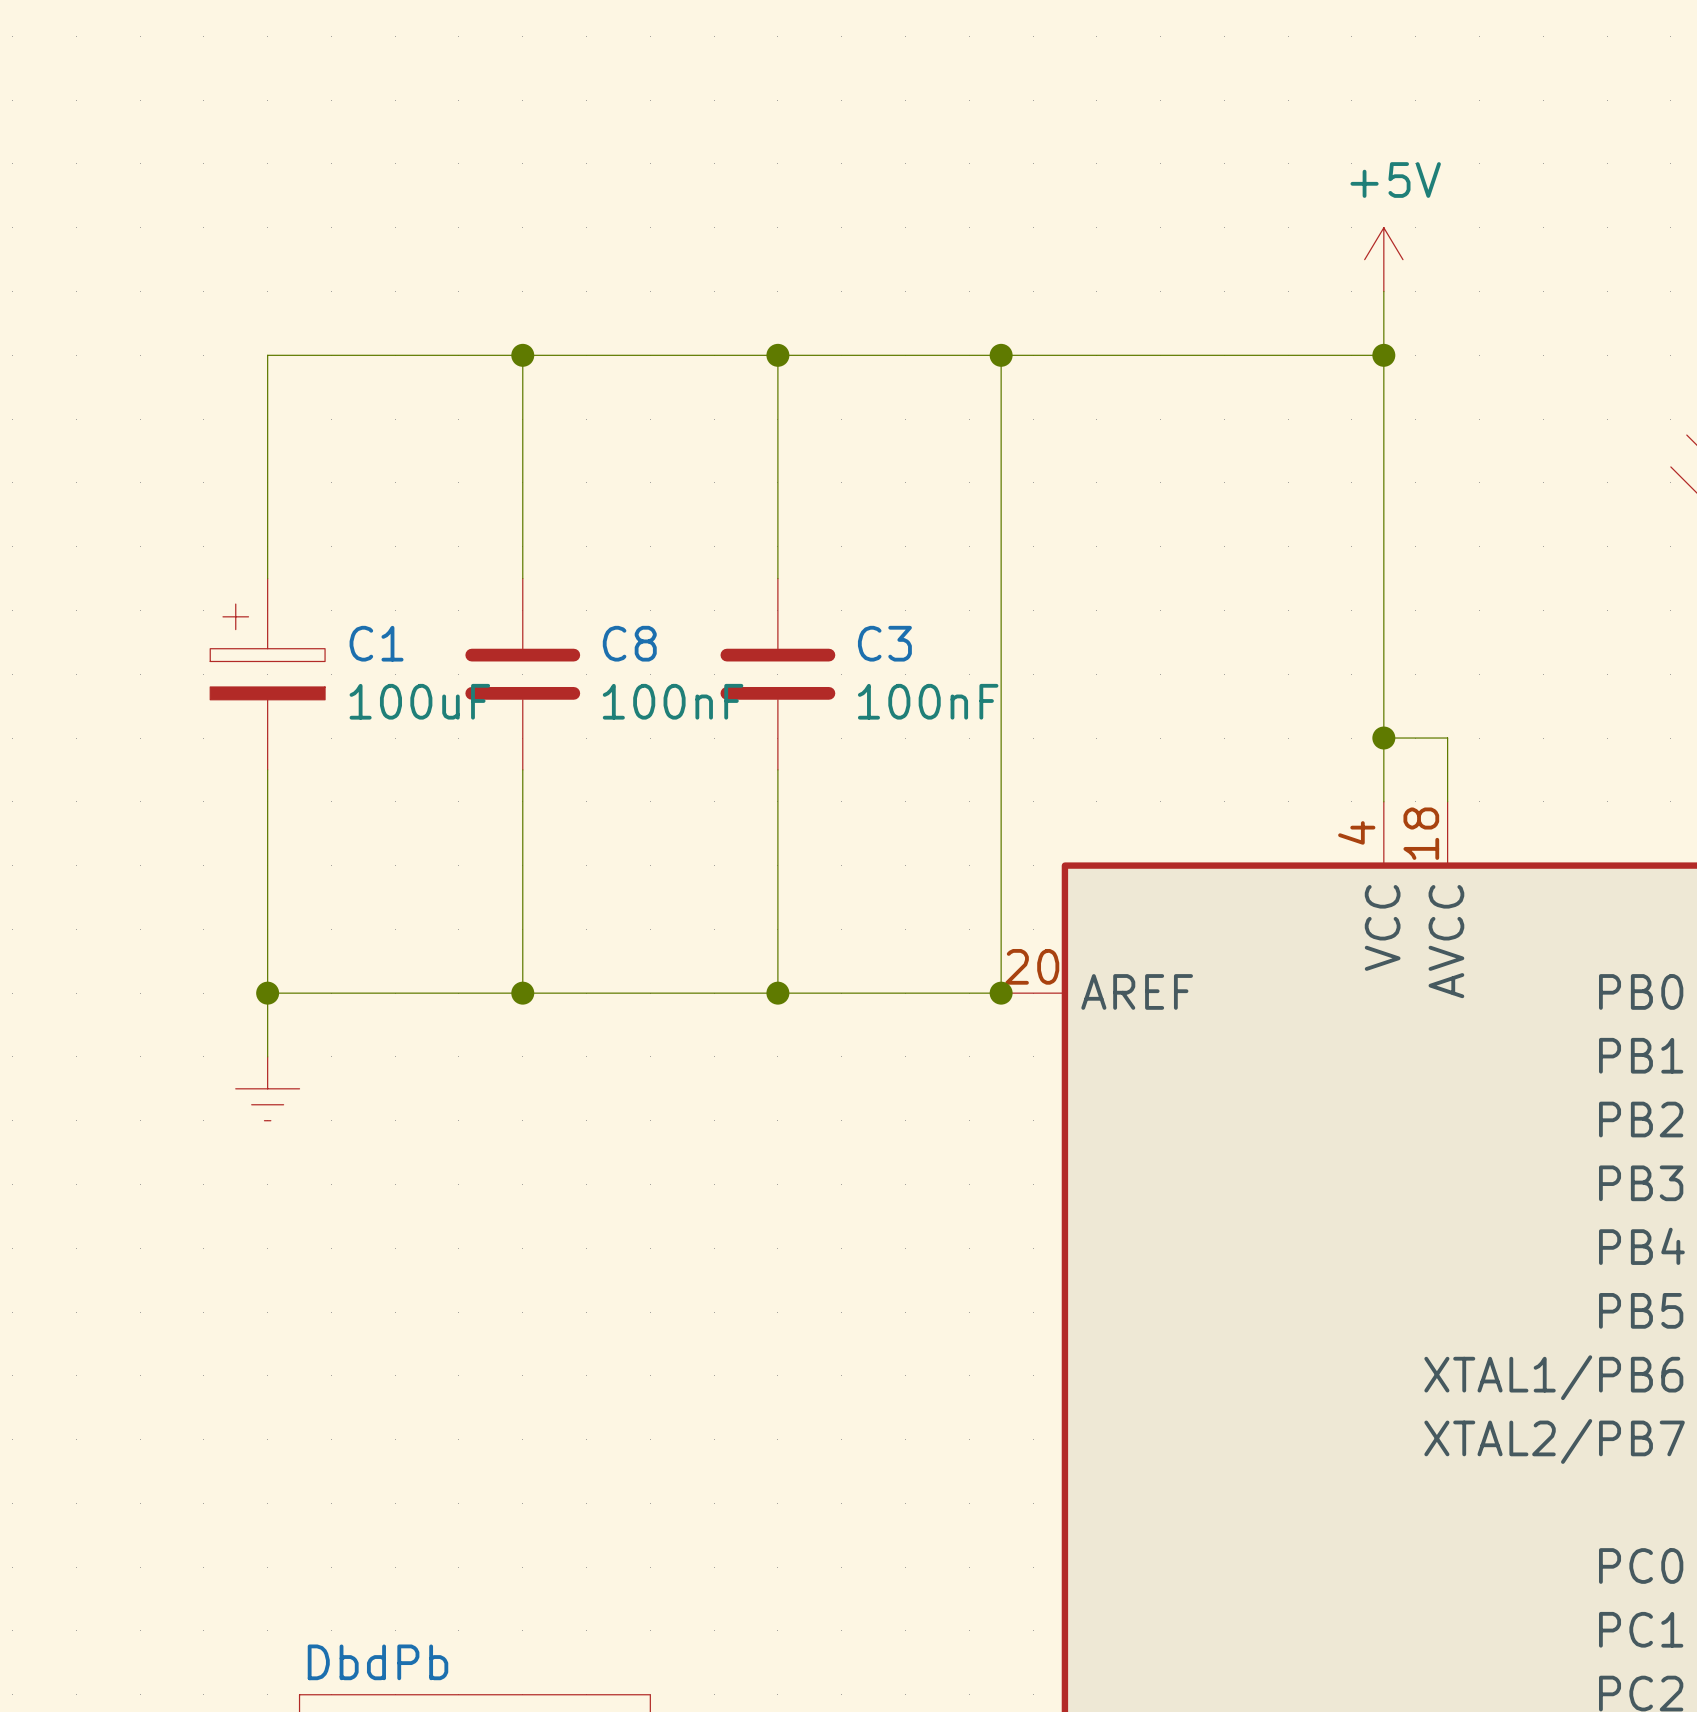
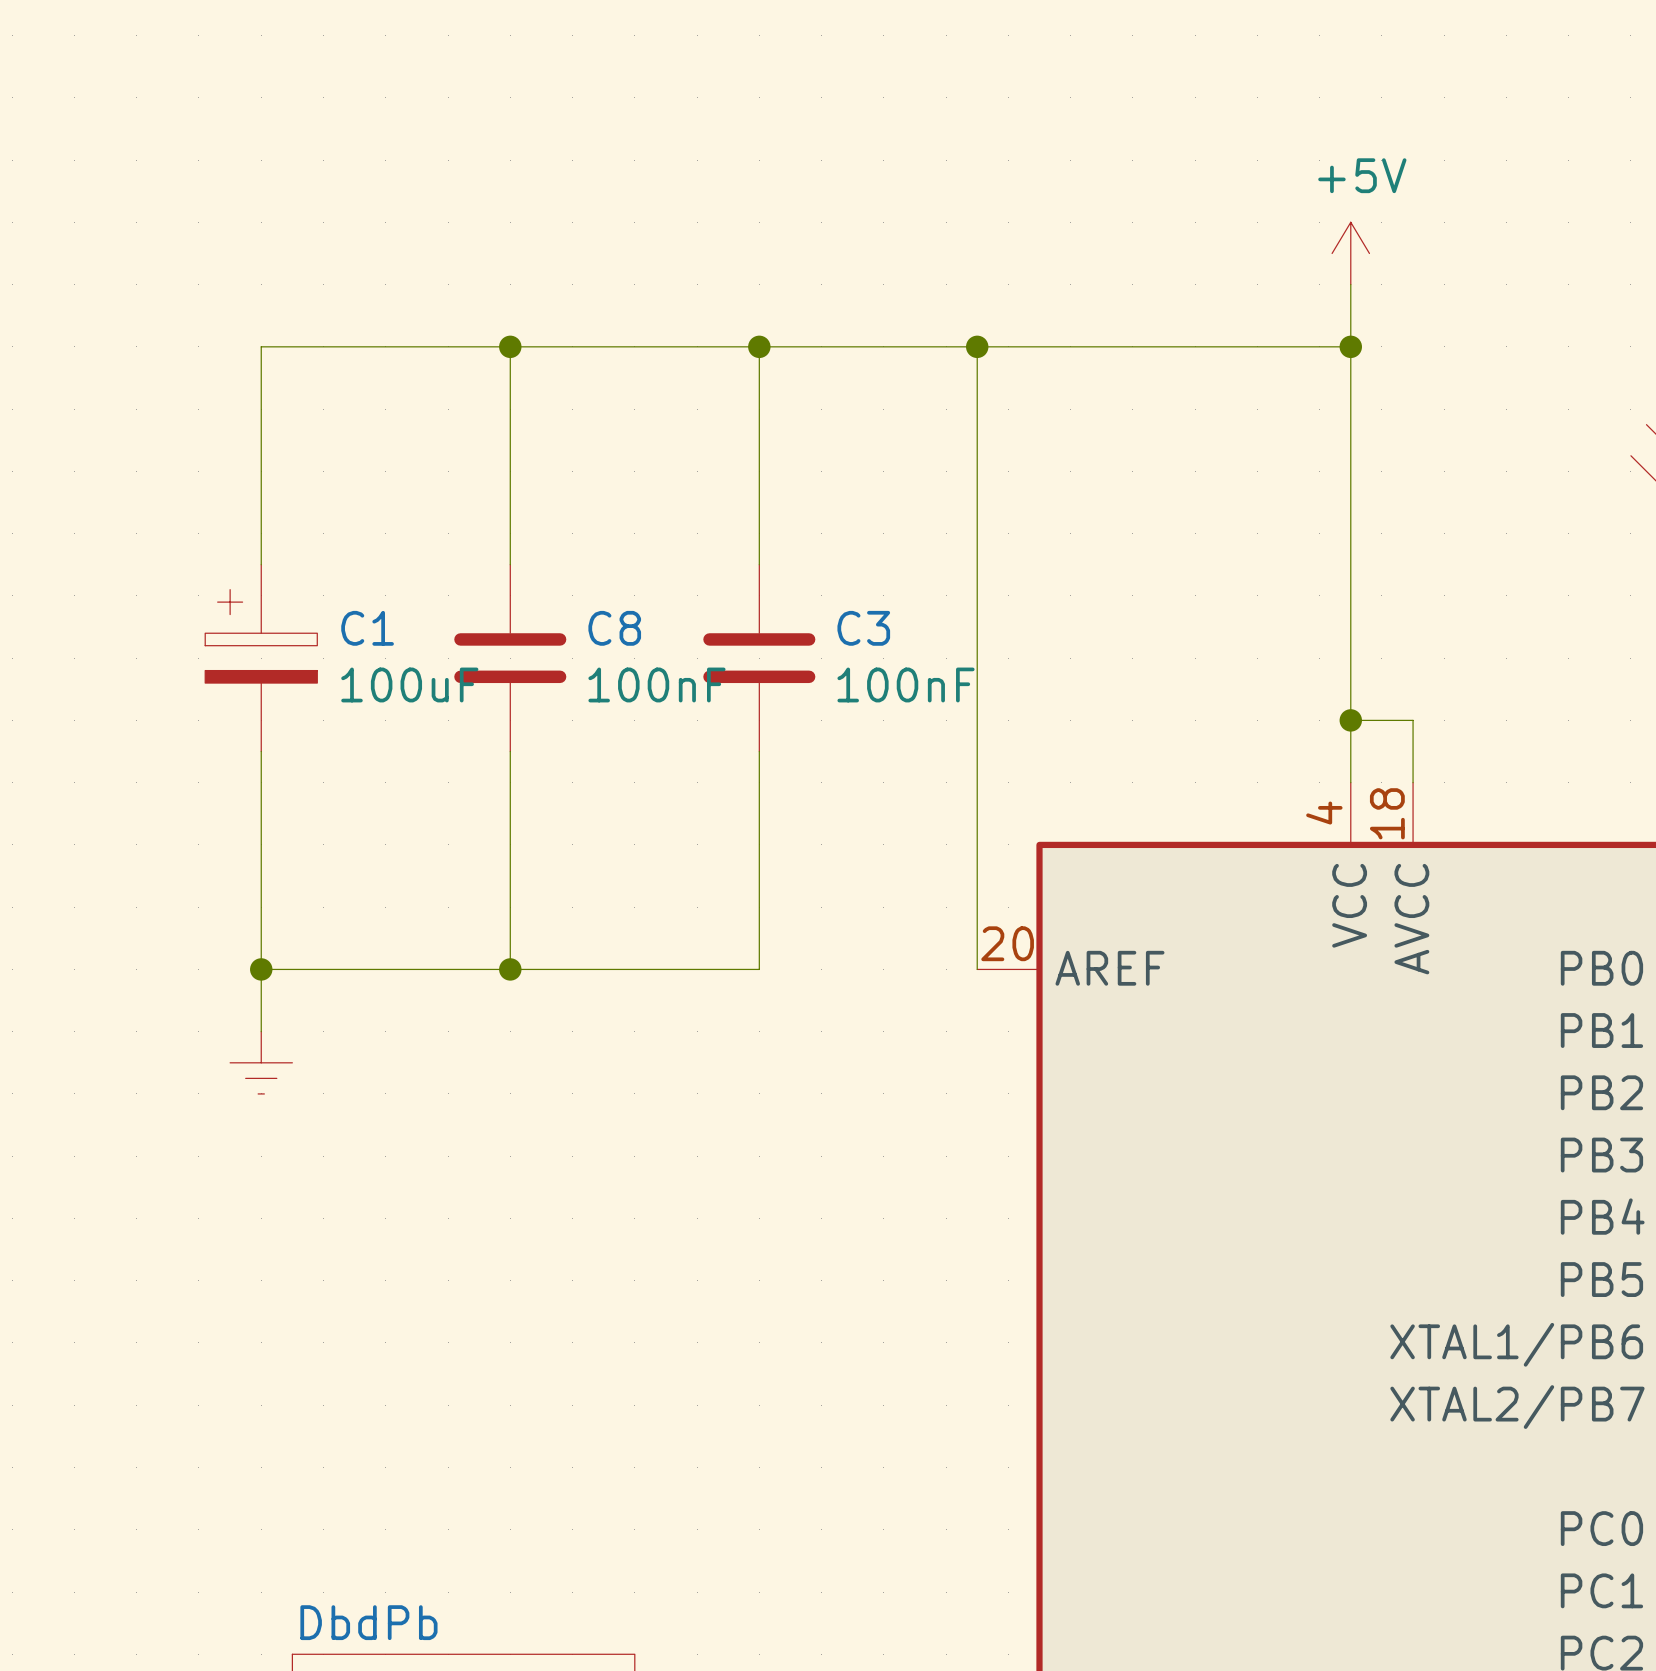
wire: (777, 993) (1001, 993) -> none
junction: (777, 993) -> none
junction: (1001, 993) -> none

